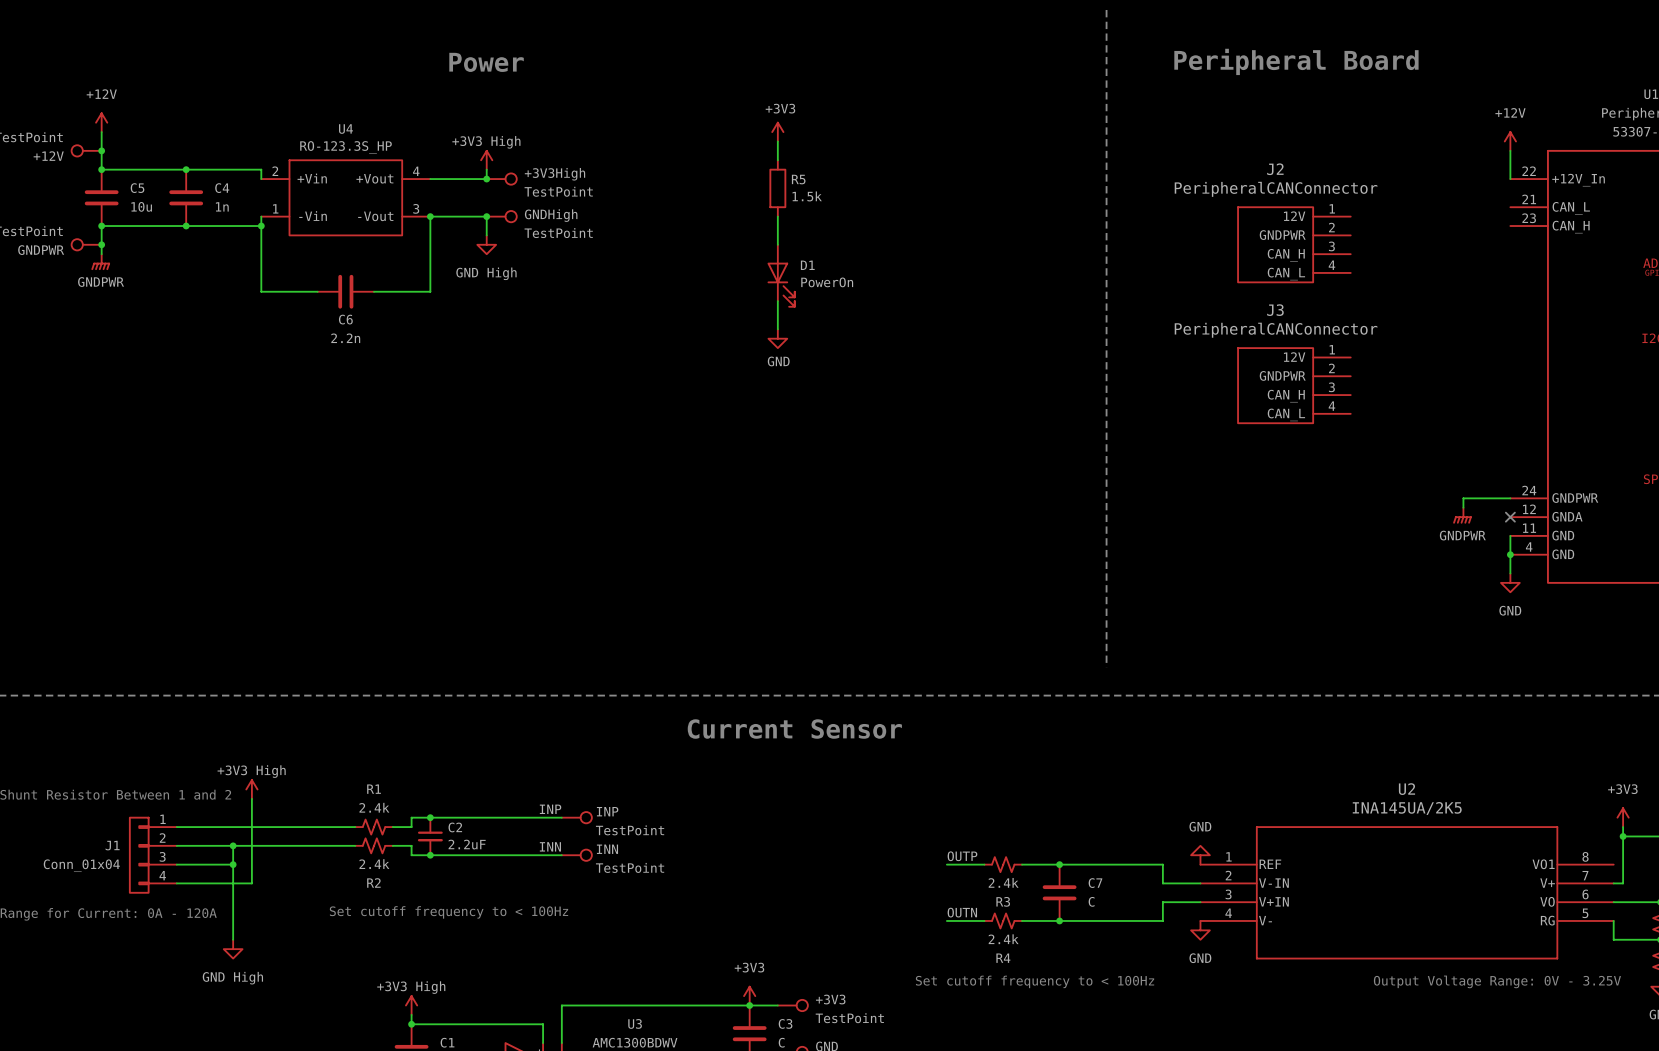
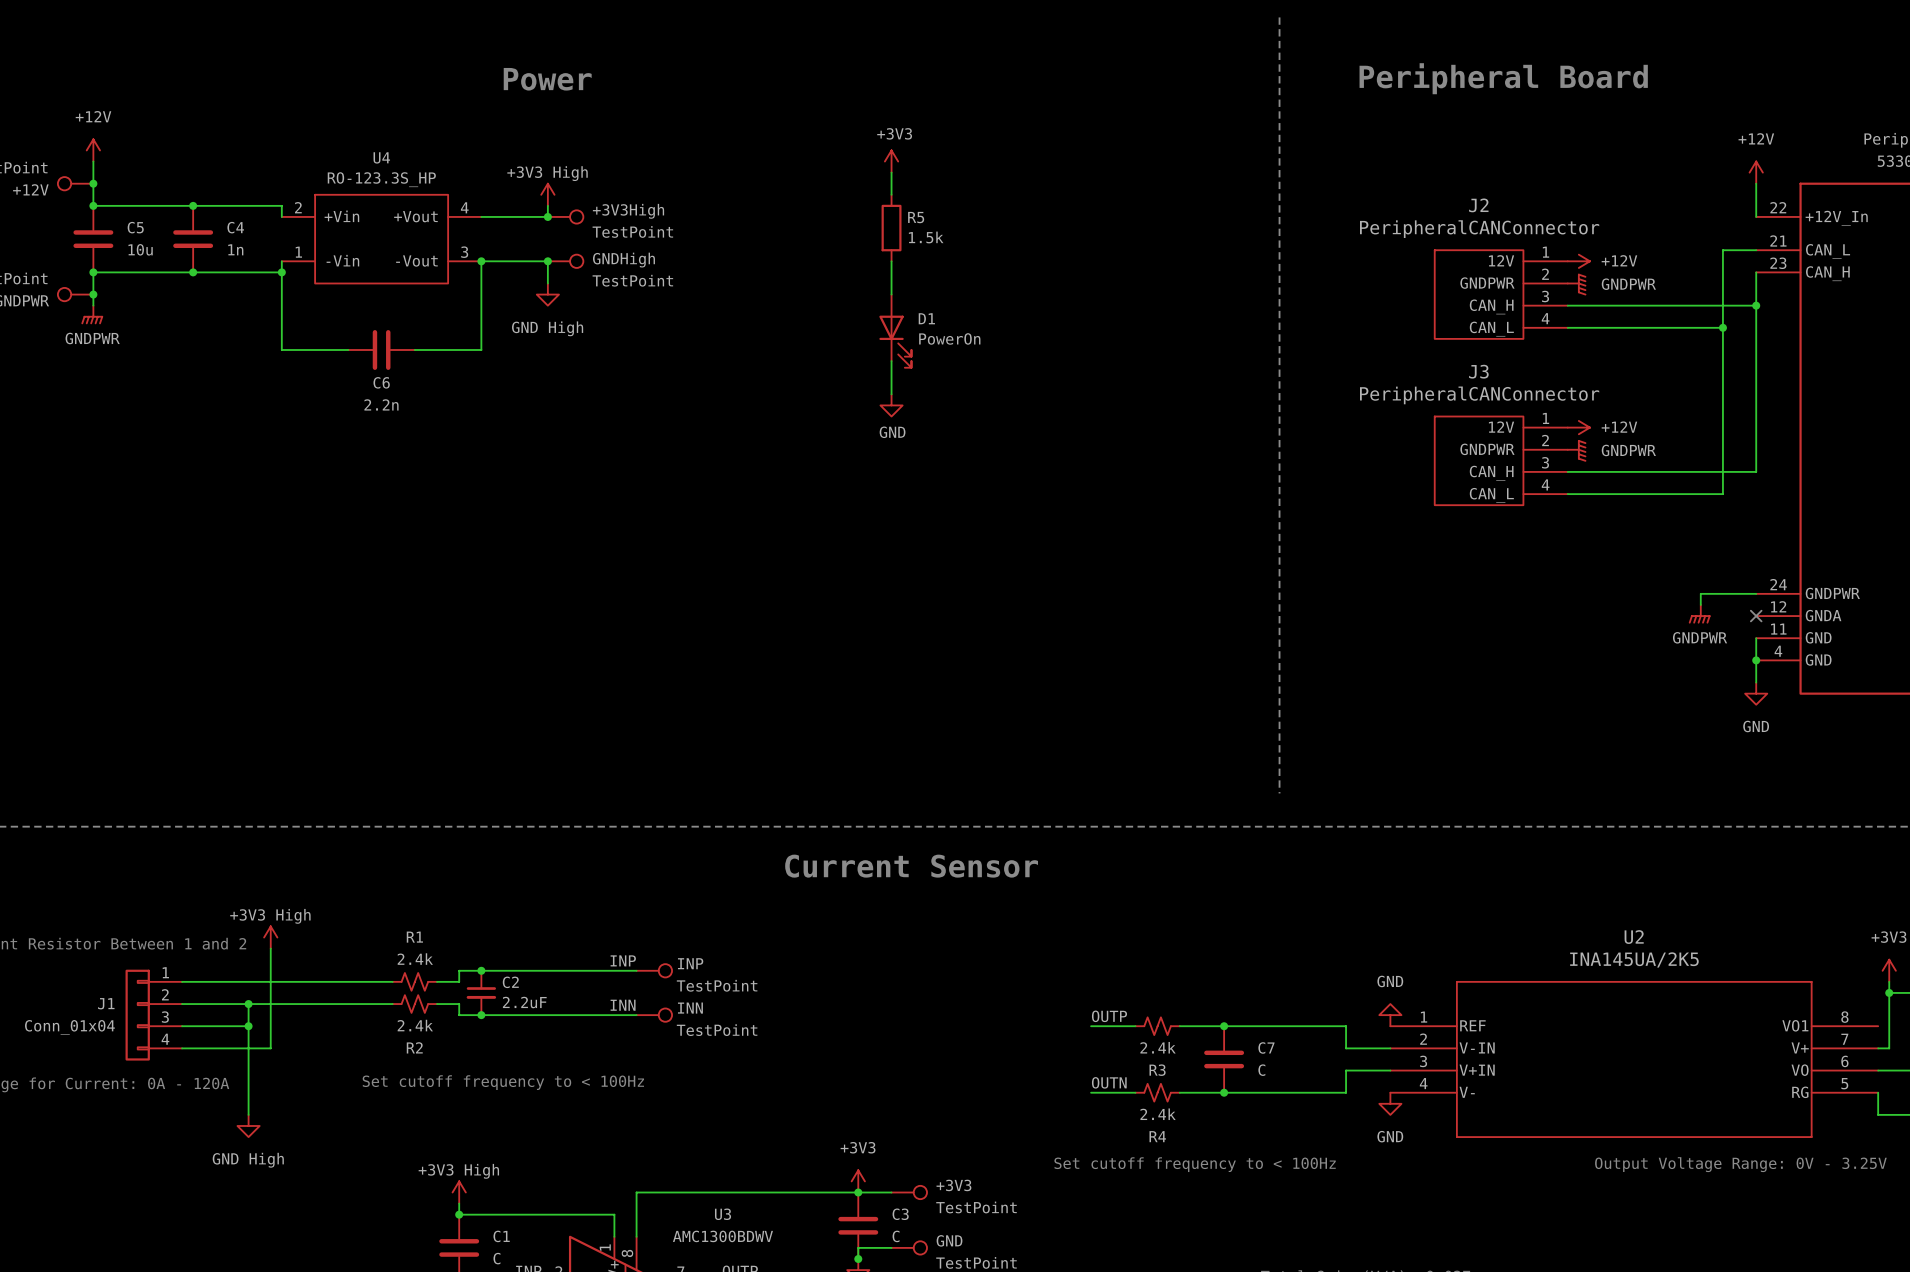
wire: none -> (1756, 250) (1722, 250) (1722, 494) (1567, 494)
power symbol: none -> +12V (1578, 261)
wire: none -> (1756, 272) (1756, 471) (1567, 471)
power symbol: none -> GNDPWR (1577, 284)
wire: none -> (1567, 305) (1756, 305)
junction: none -> (1756, 305)
wire: none -> (1567, 327) (1722, 327)
junction: none -> (1722, 327)
power symbol: none -> +12V (1578, 427)
power symbol: none -> GNDPWR (1577, 450)

